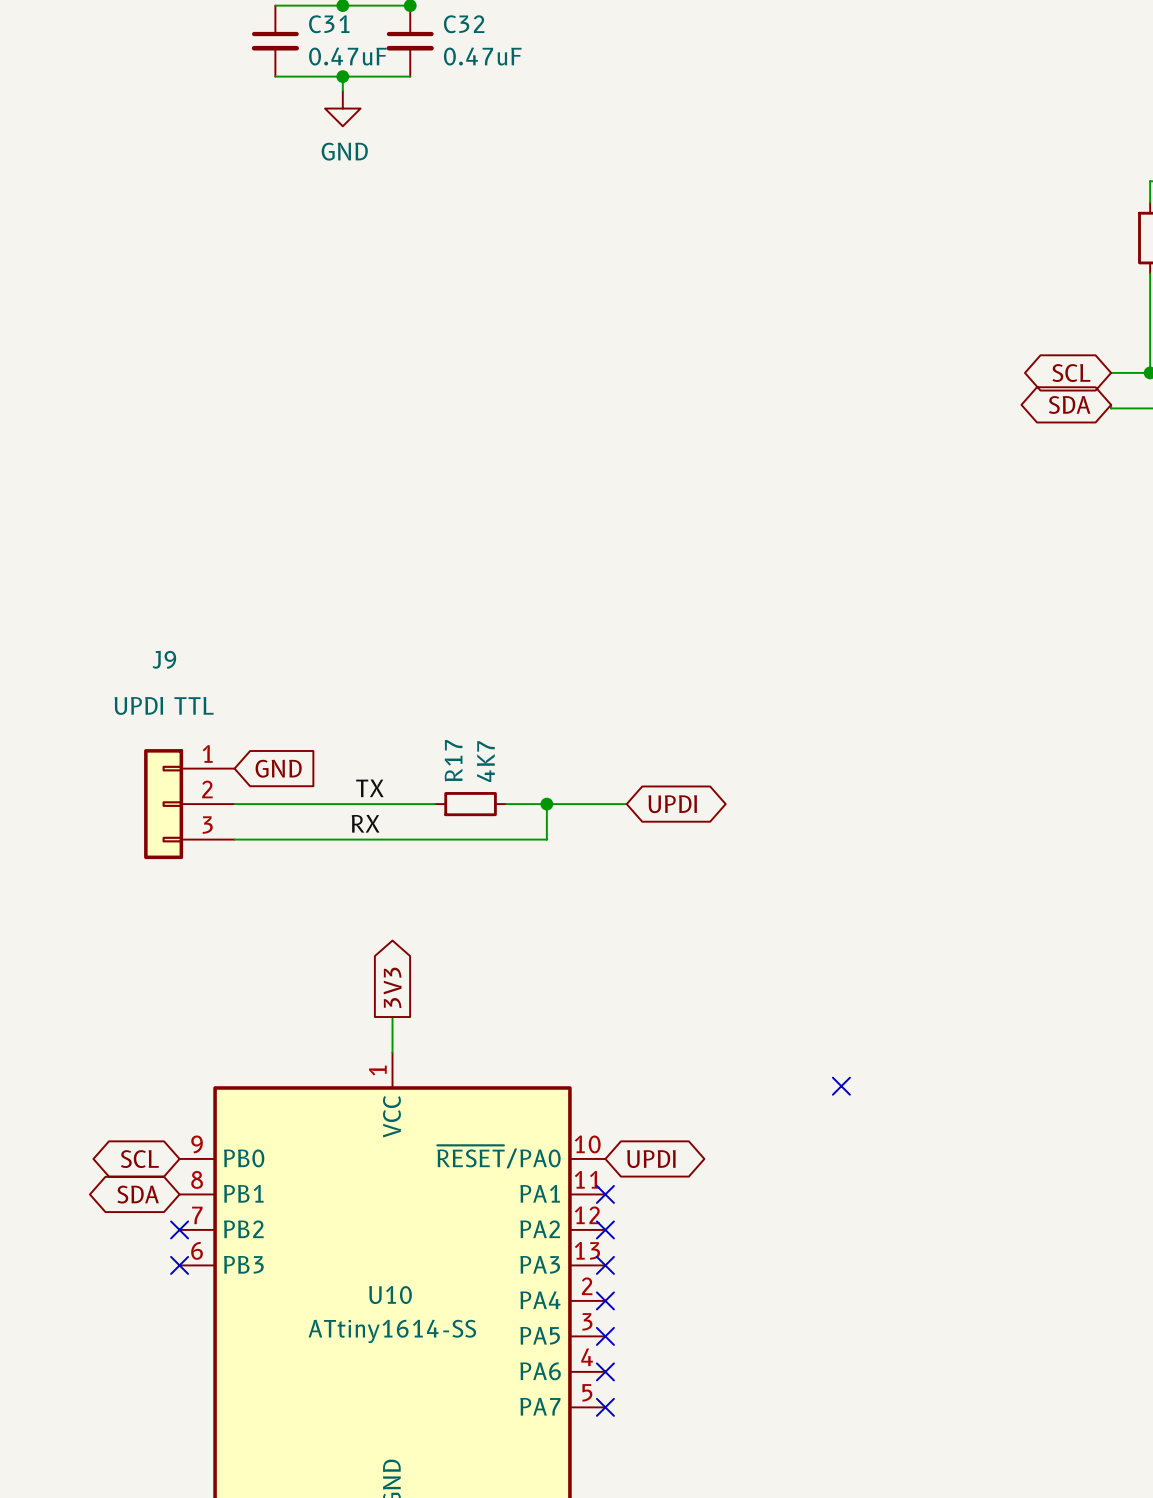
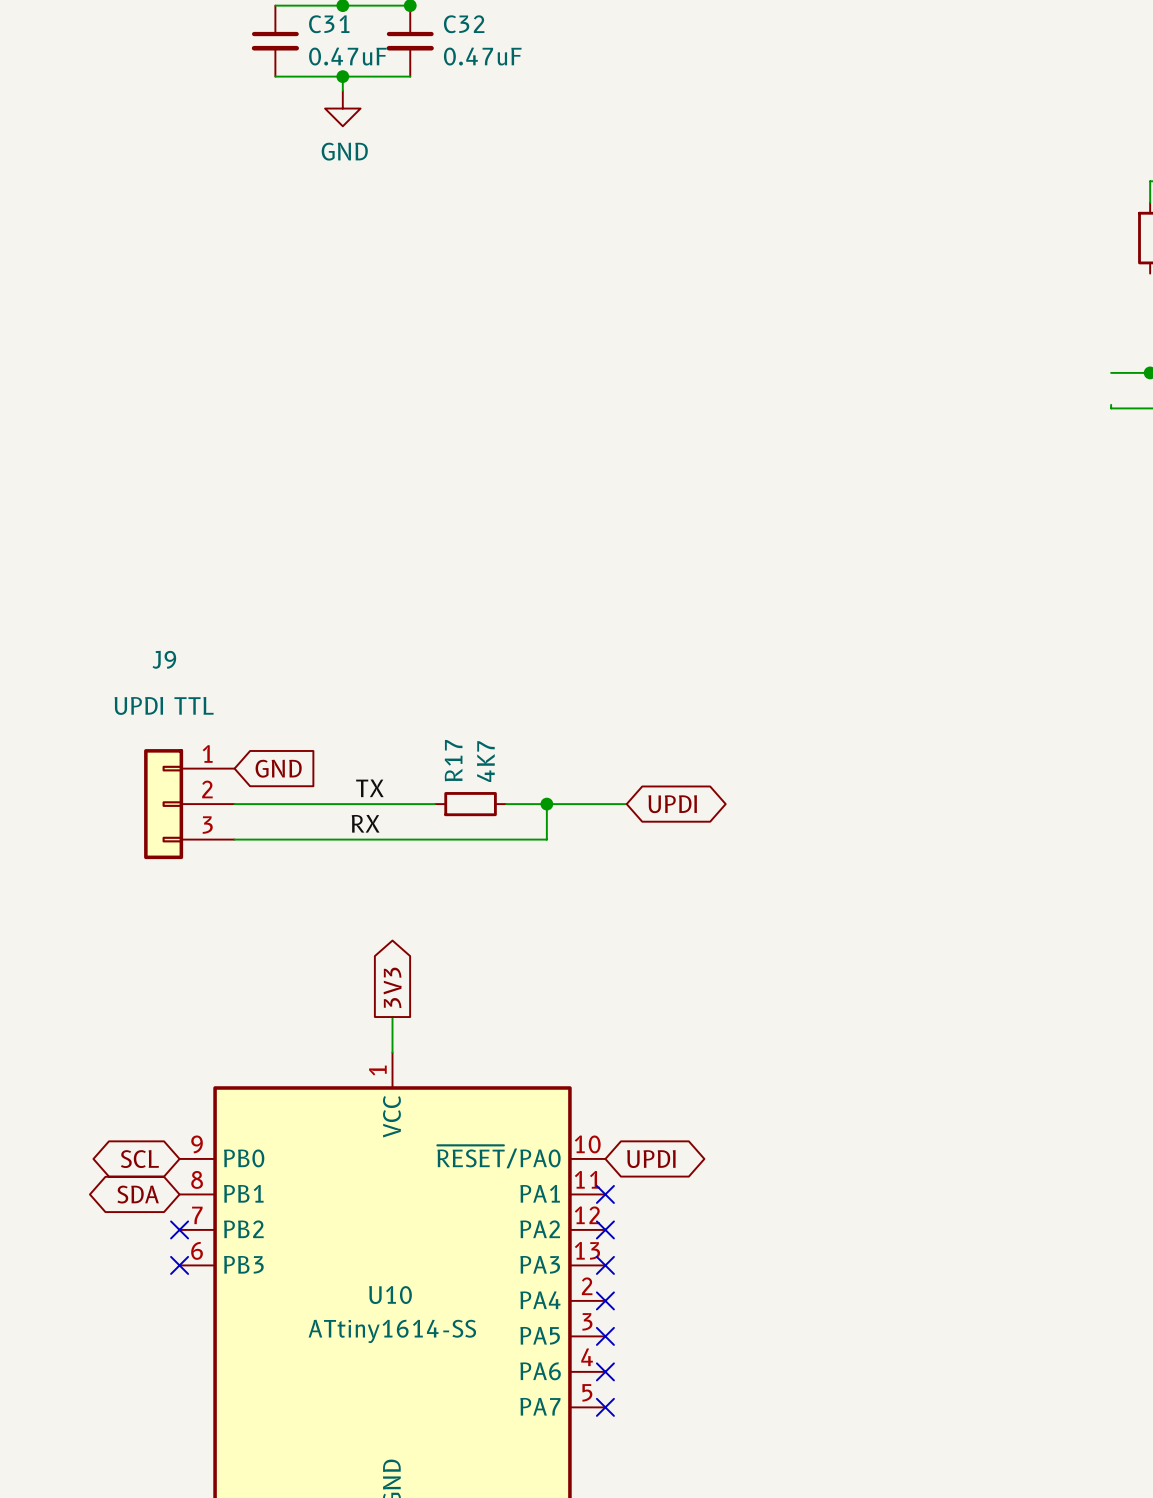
wire: (1150, 273) (1150, 372) -> none
global label: SCL (1071, 373) -> none
global label: SDA (1069, 404) -> none
no-connect mark: (841, 1086) -> none

